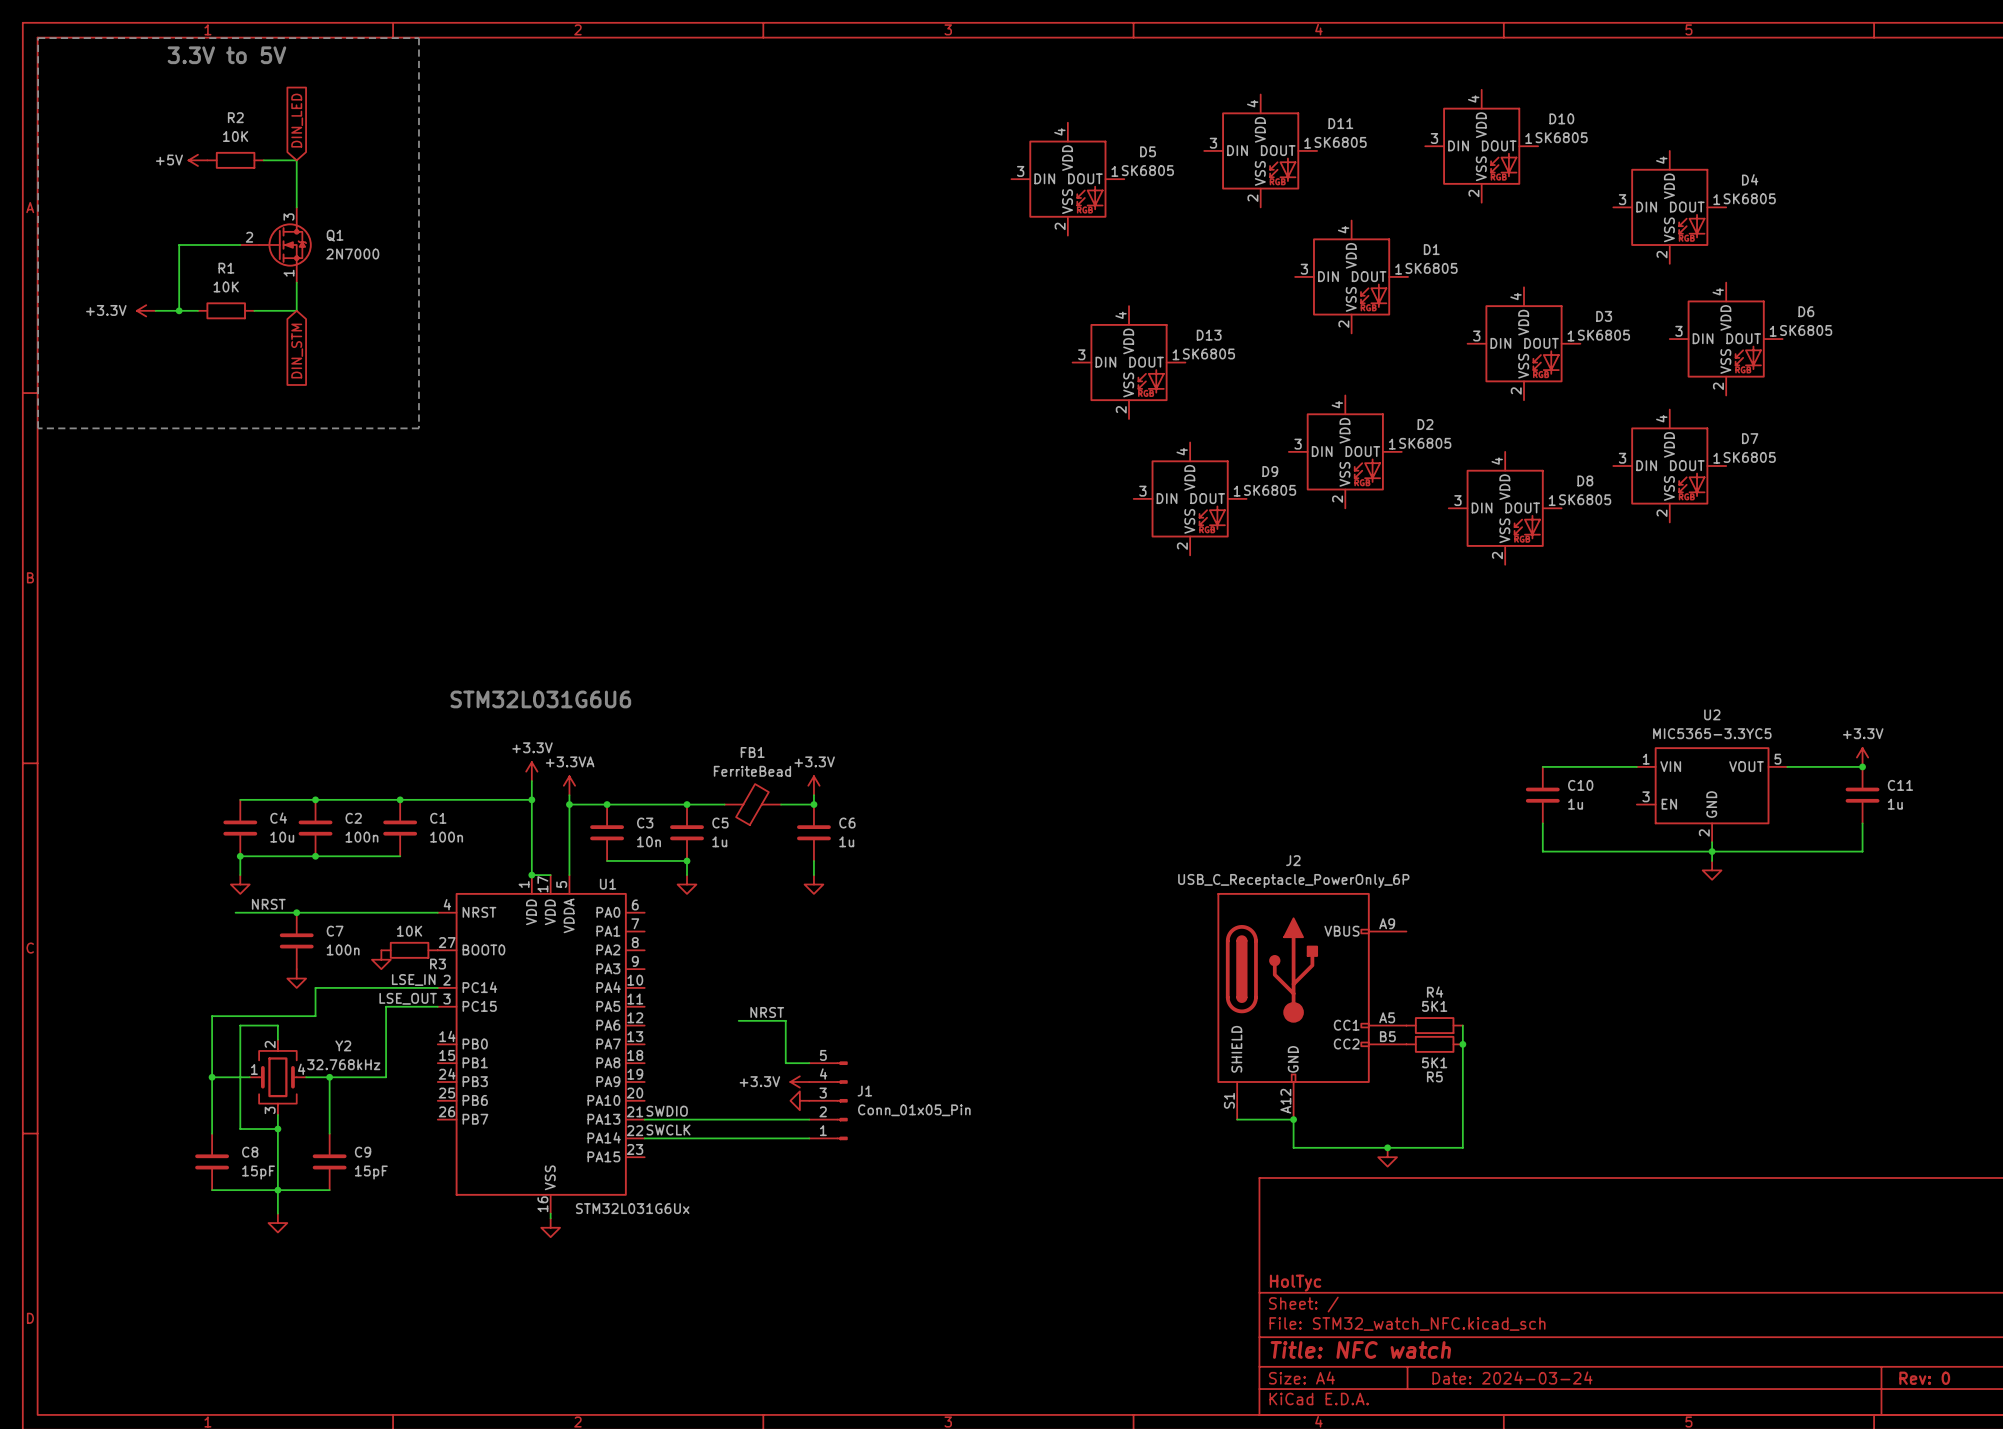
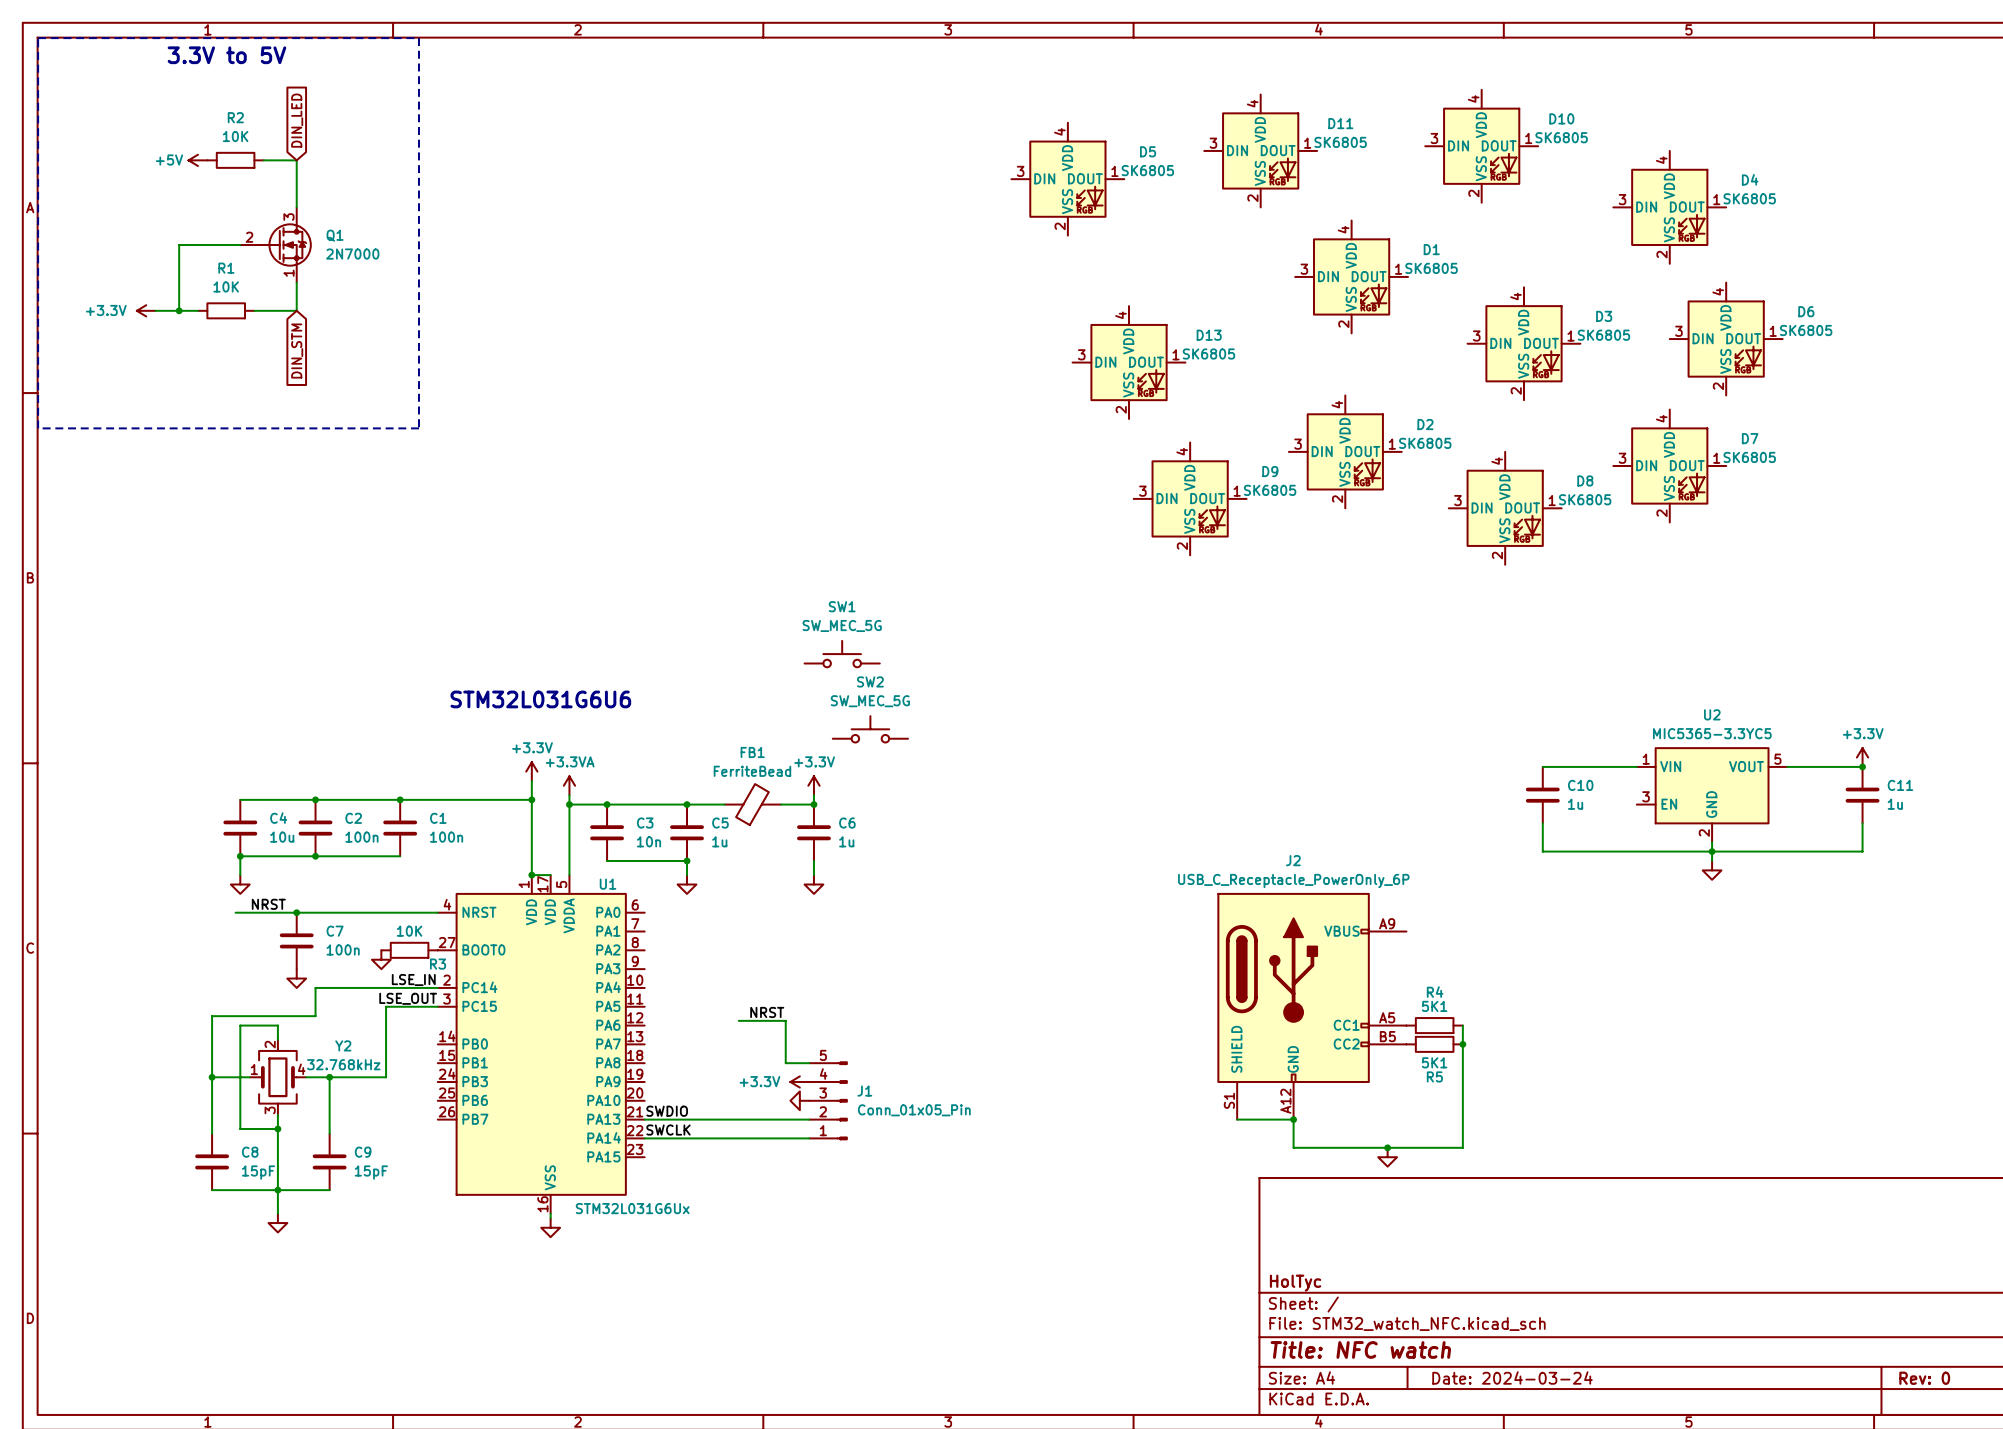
SW1: none -> SW_MEC_5G (842, 654)
SW2: none -> SW_MEC_5G (870, 729)

